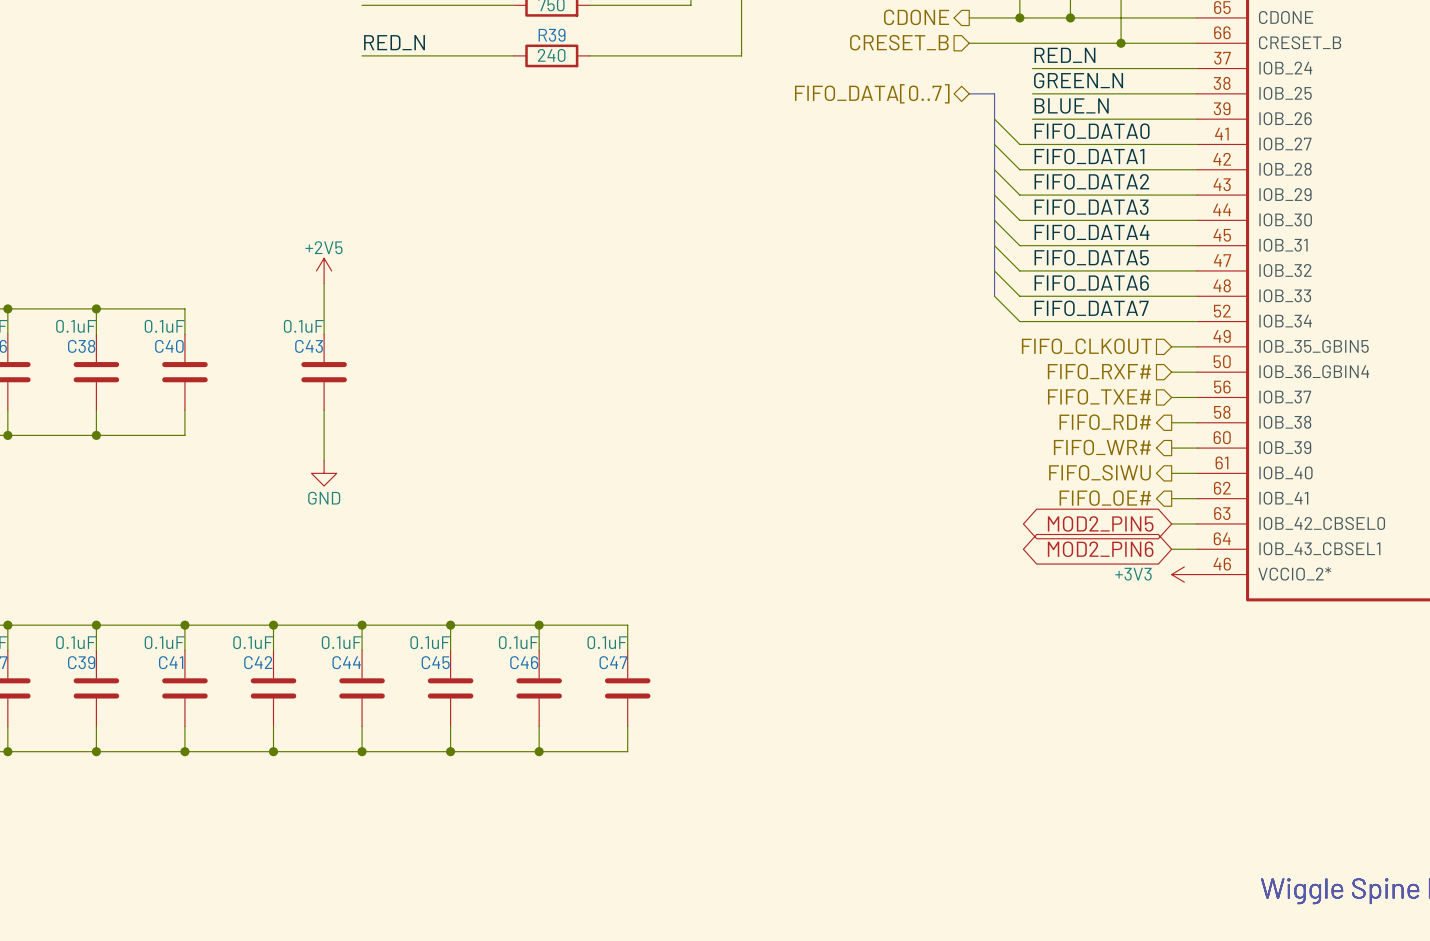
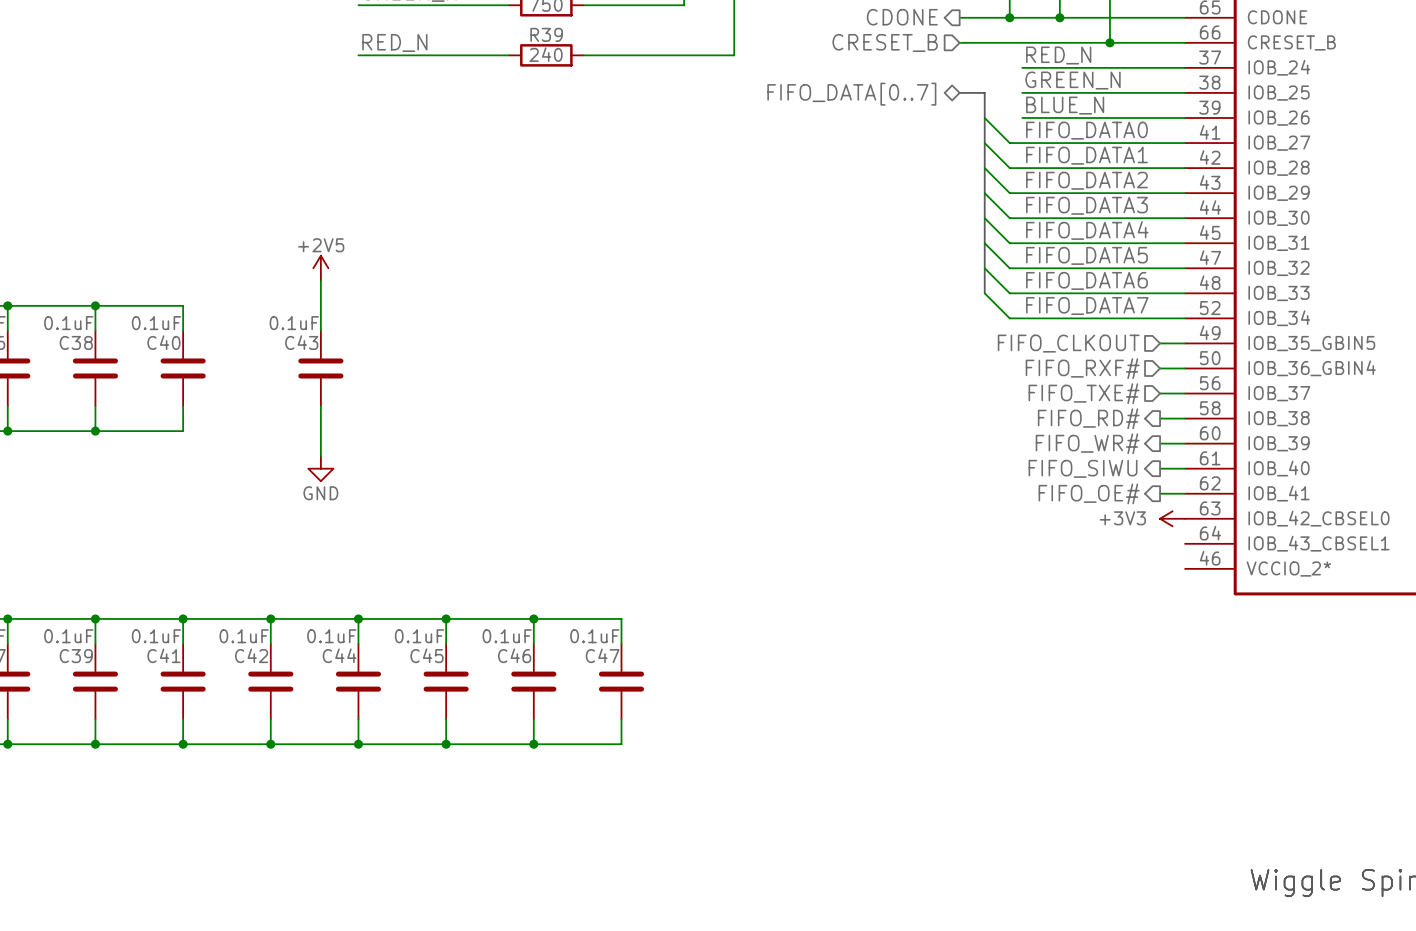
global label: MOD2_PIN5 (1100, 523) -> none
global label: MOD2_PIN6 (1100, 549) -> none
wire: (1171, 549) (1196, 549) -> none
power symbol position: +3V3 (1184, 574) -> +3V3 (1172, 518)

